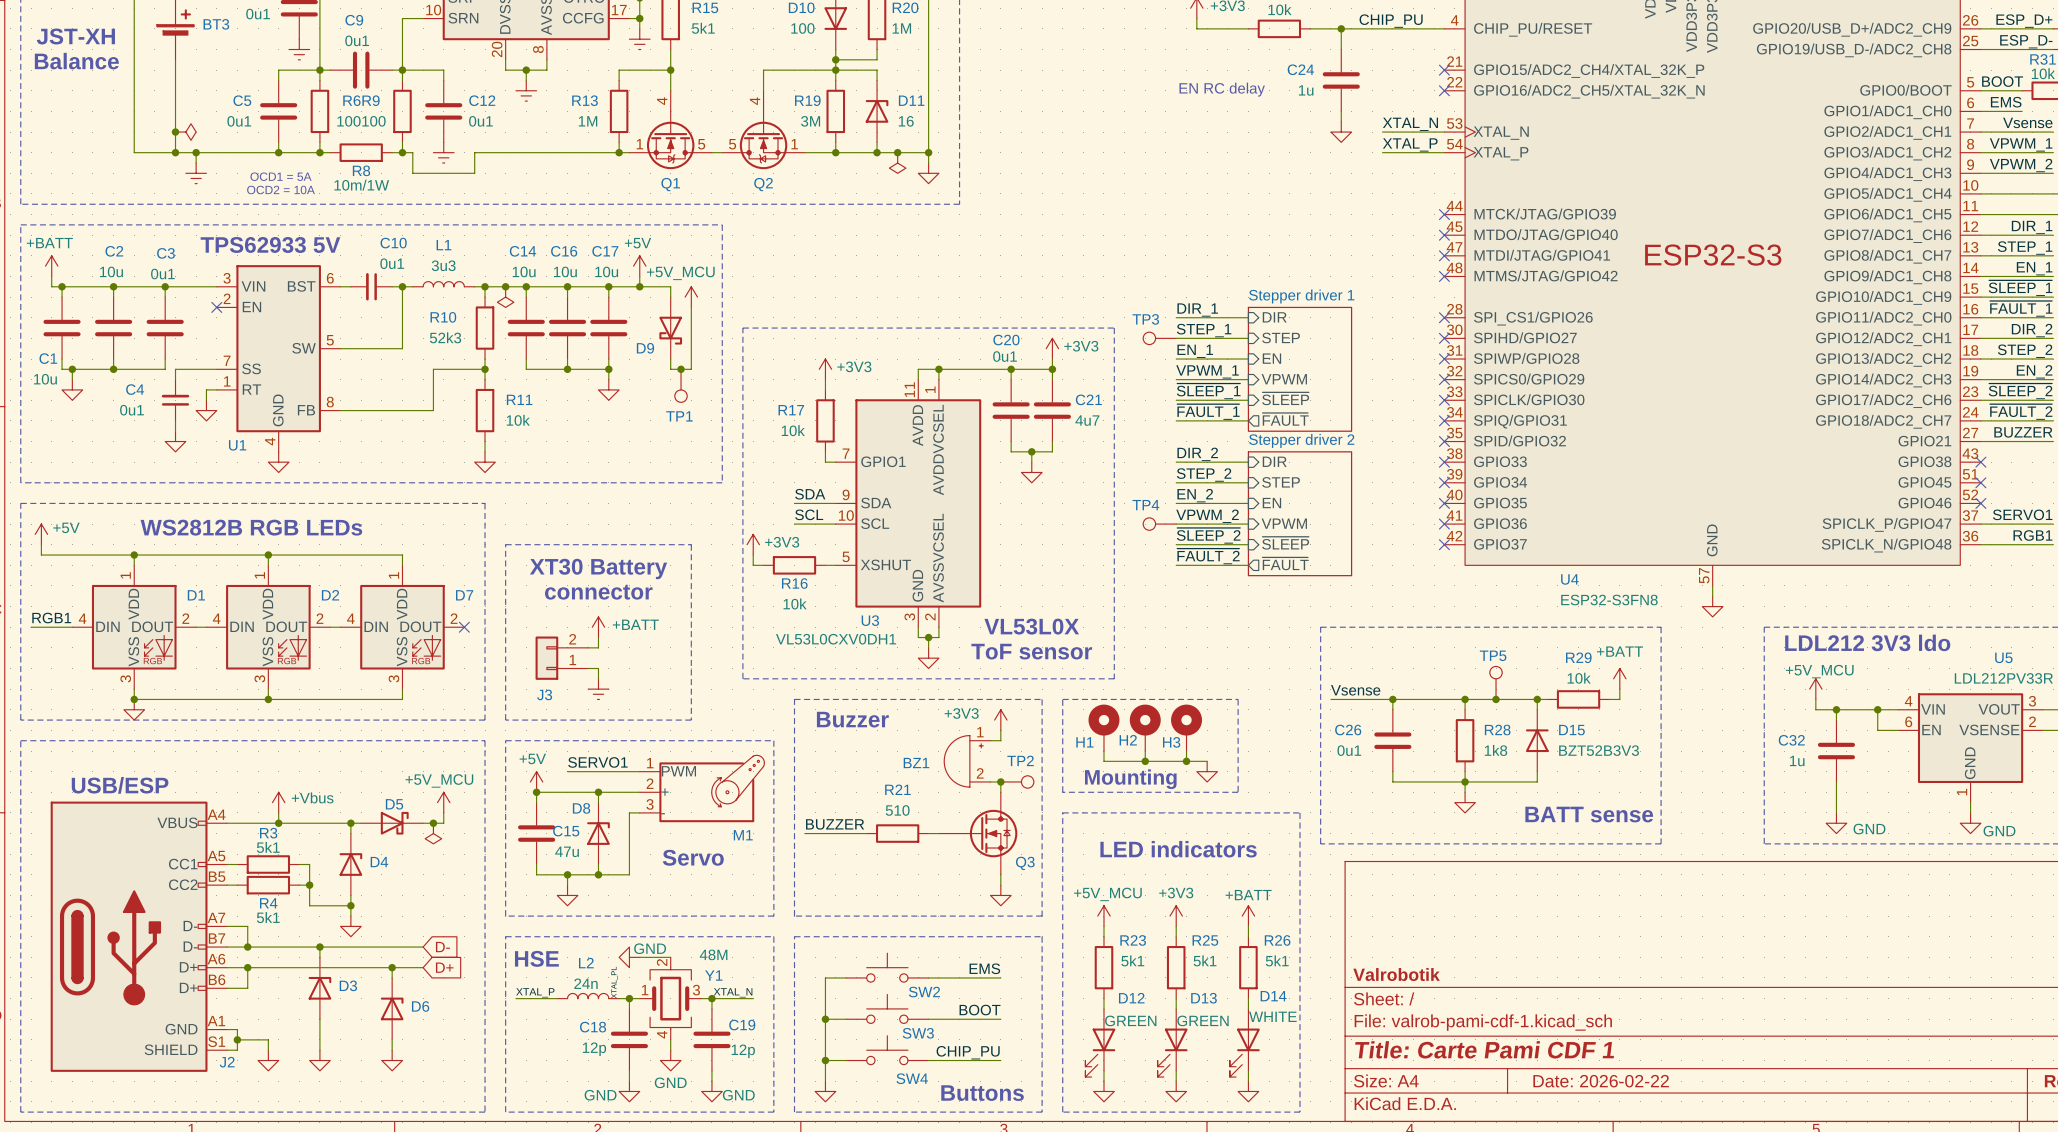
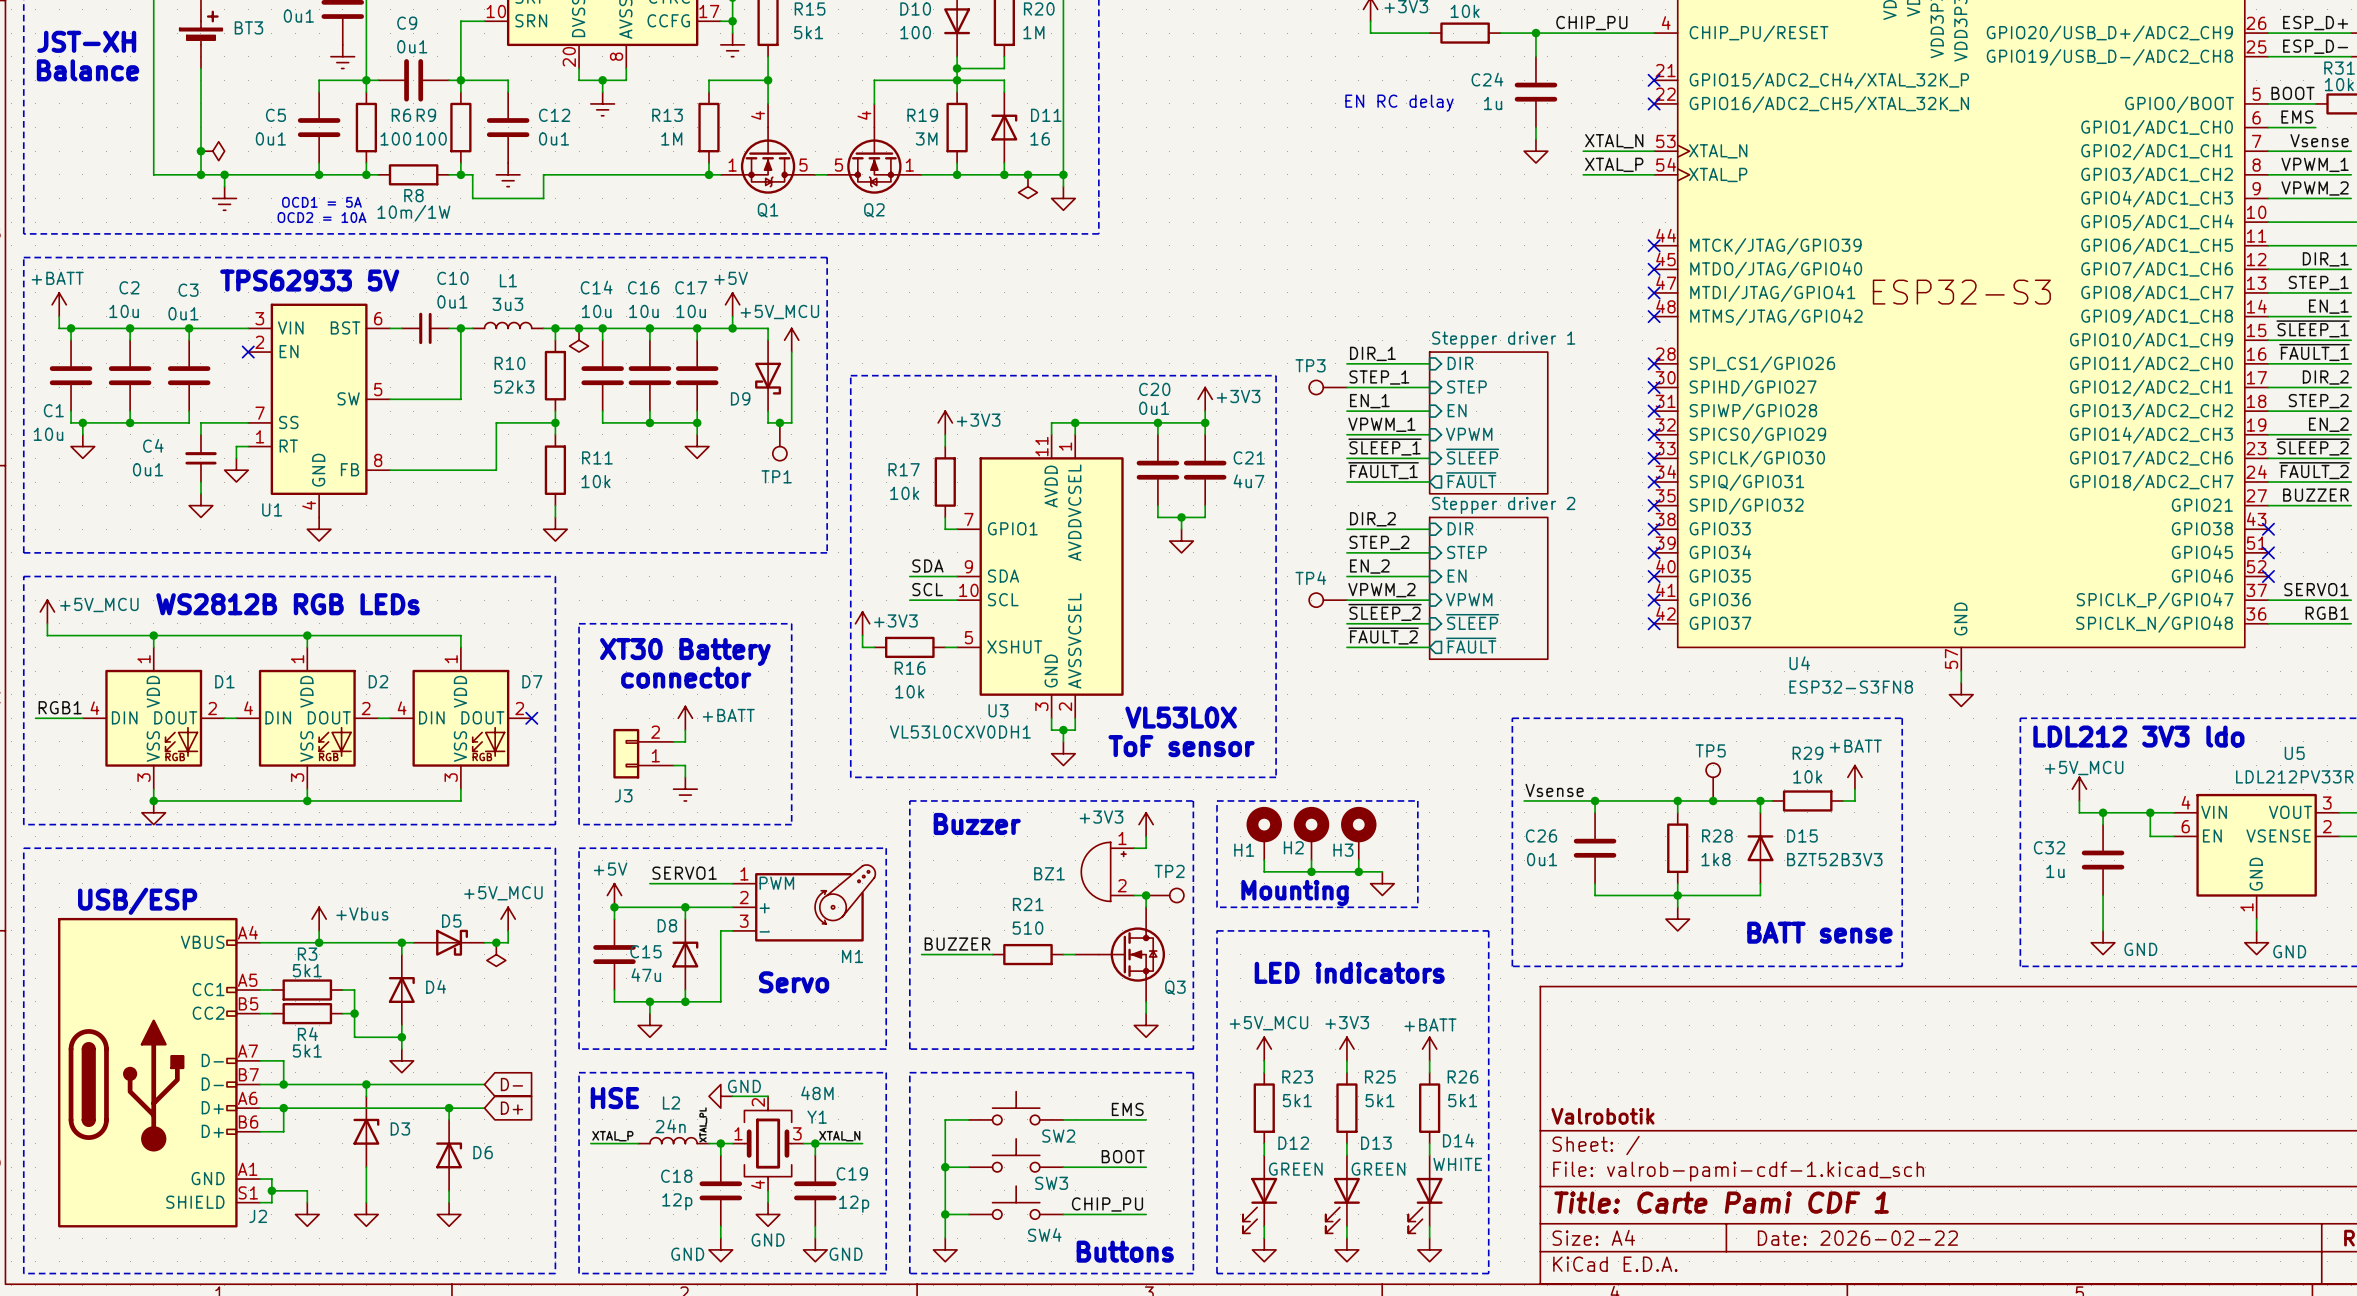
power symbol: +5V (41, 534) -> +5V_MCU (47, 611)

